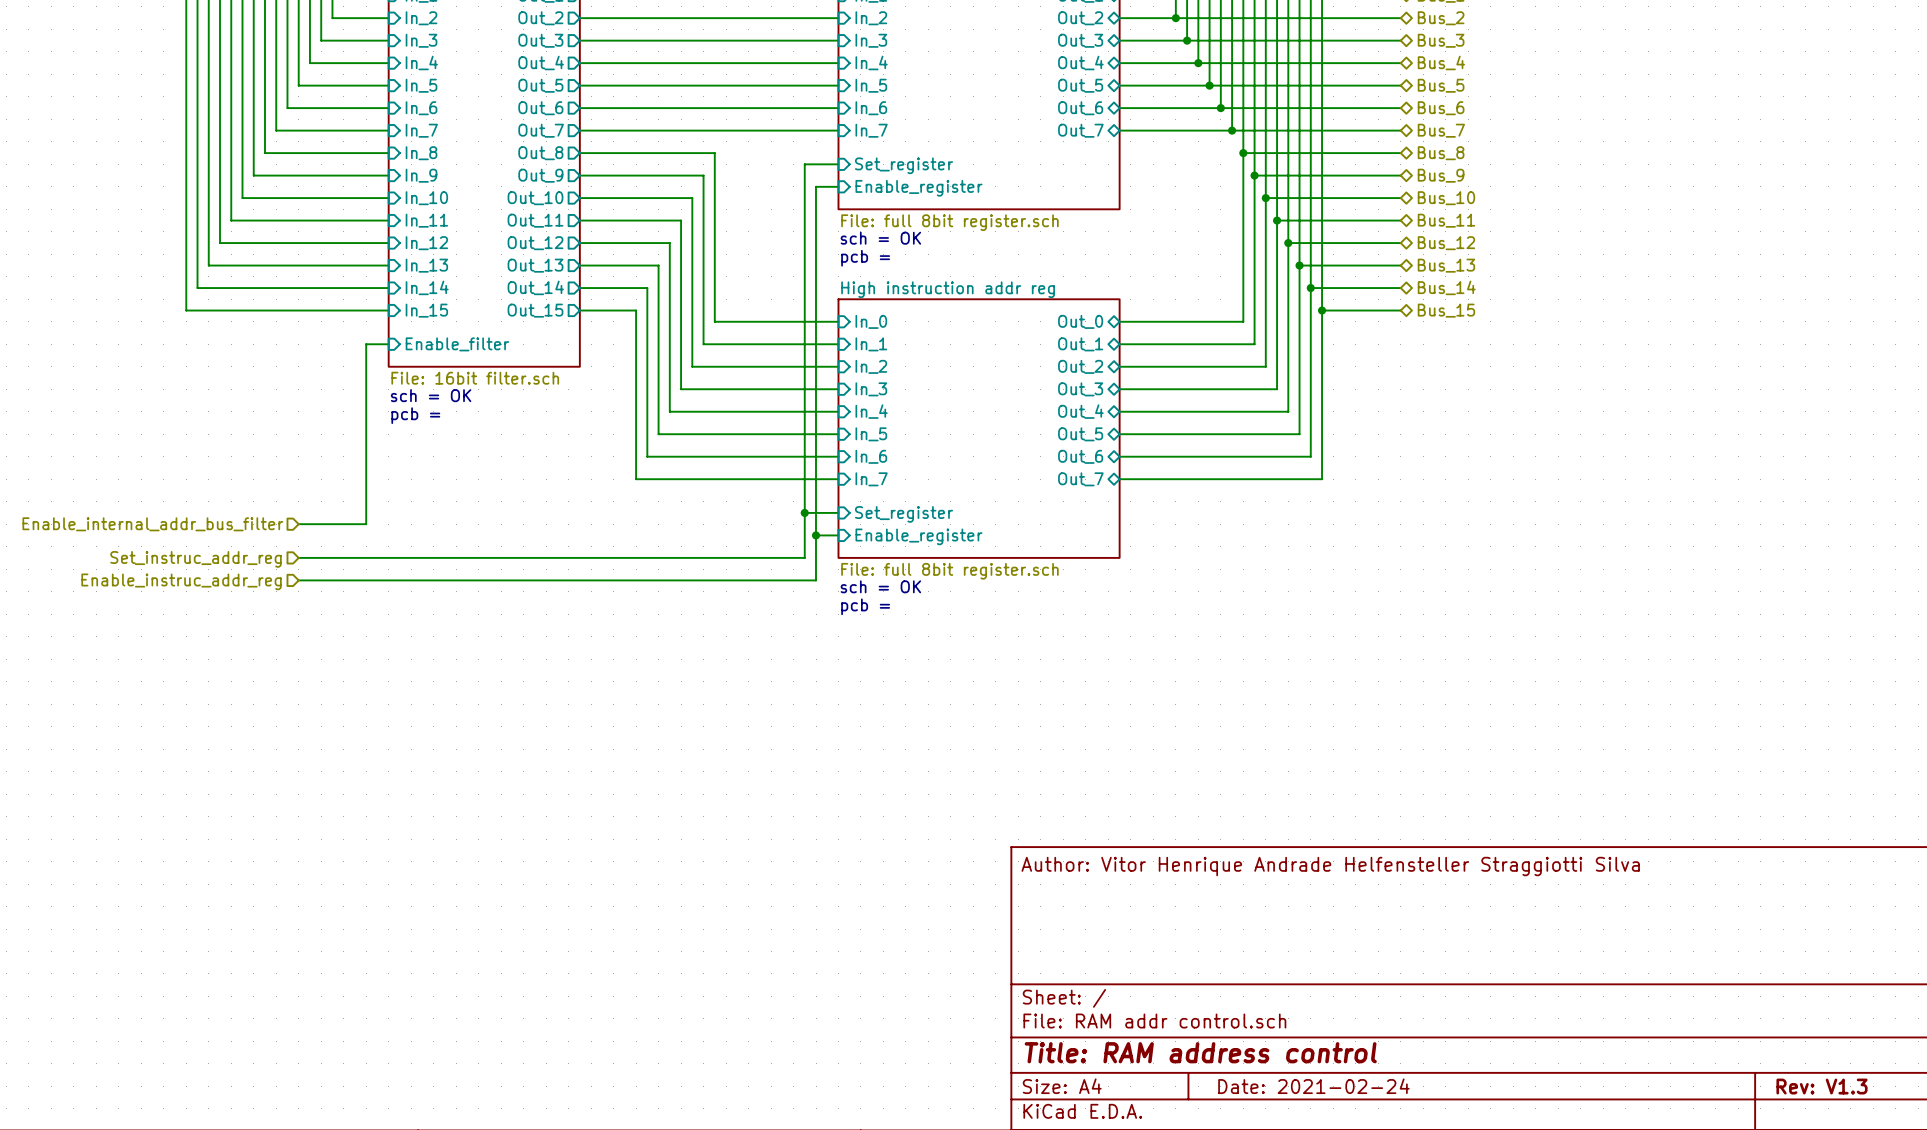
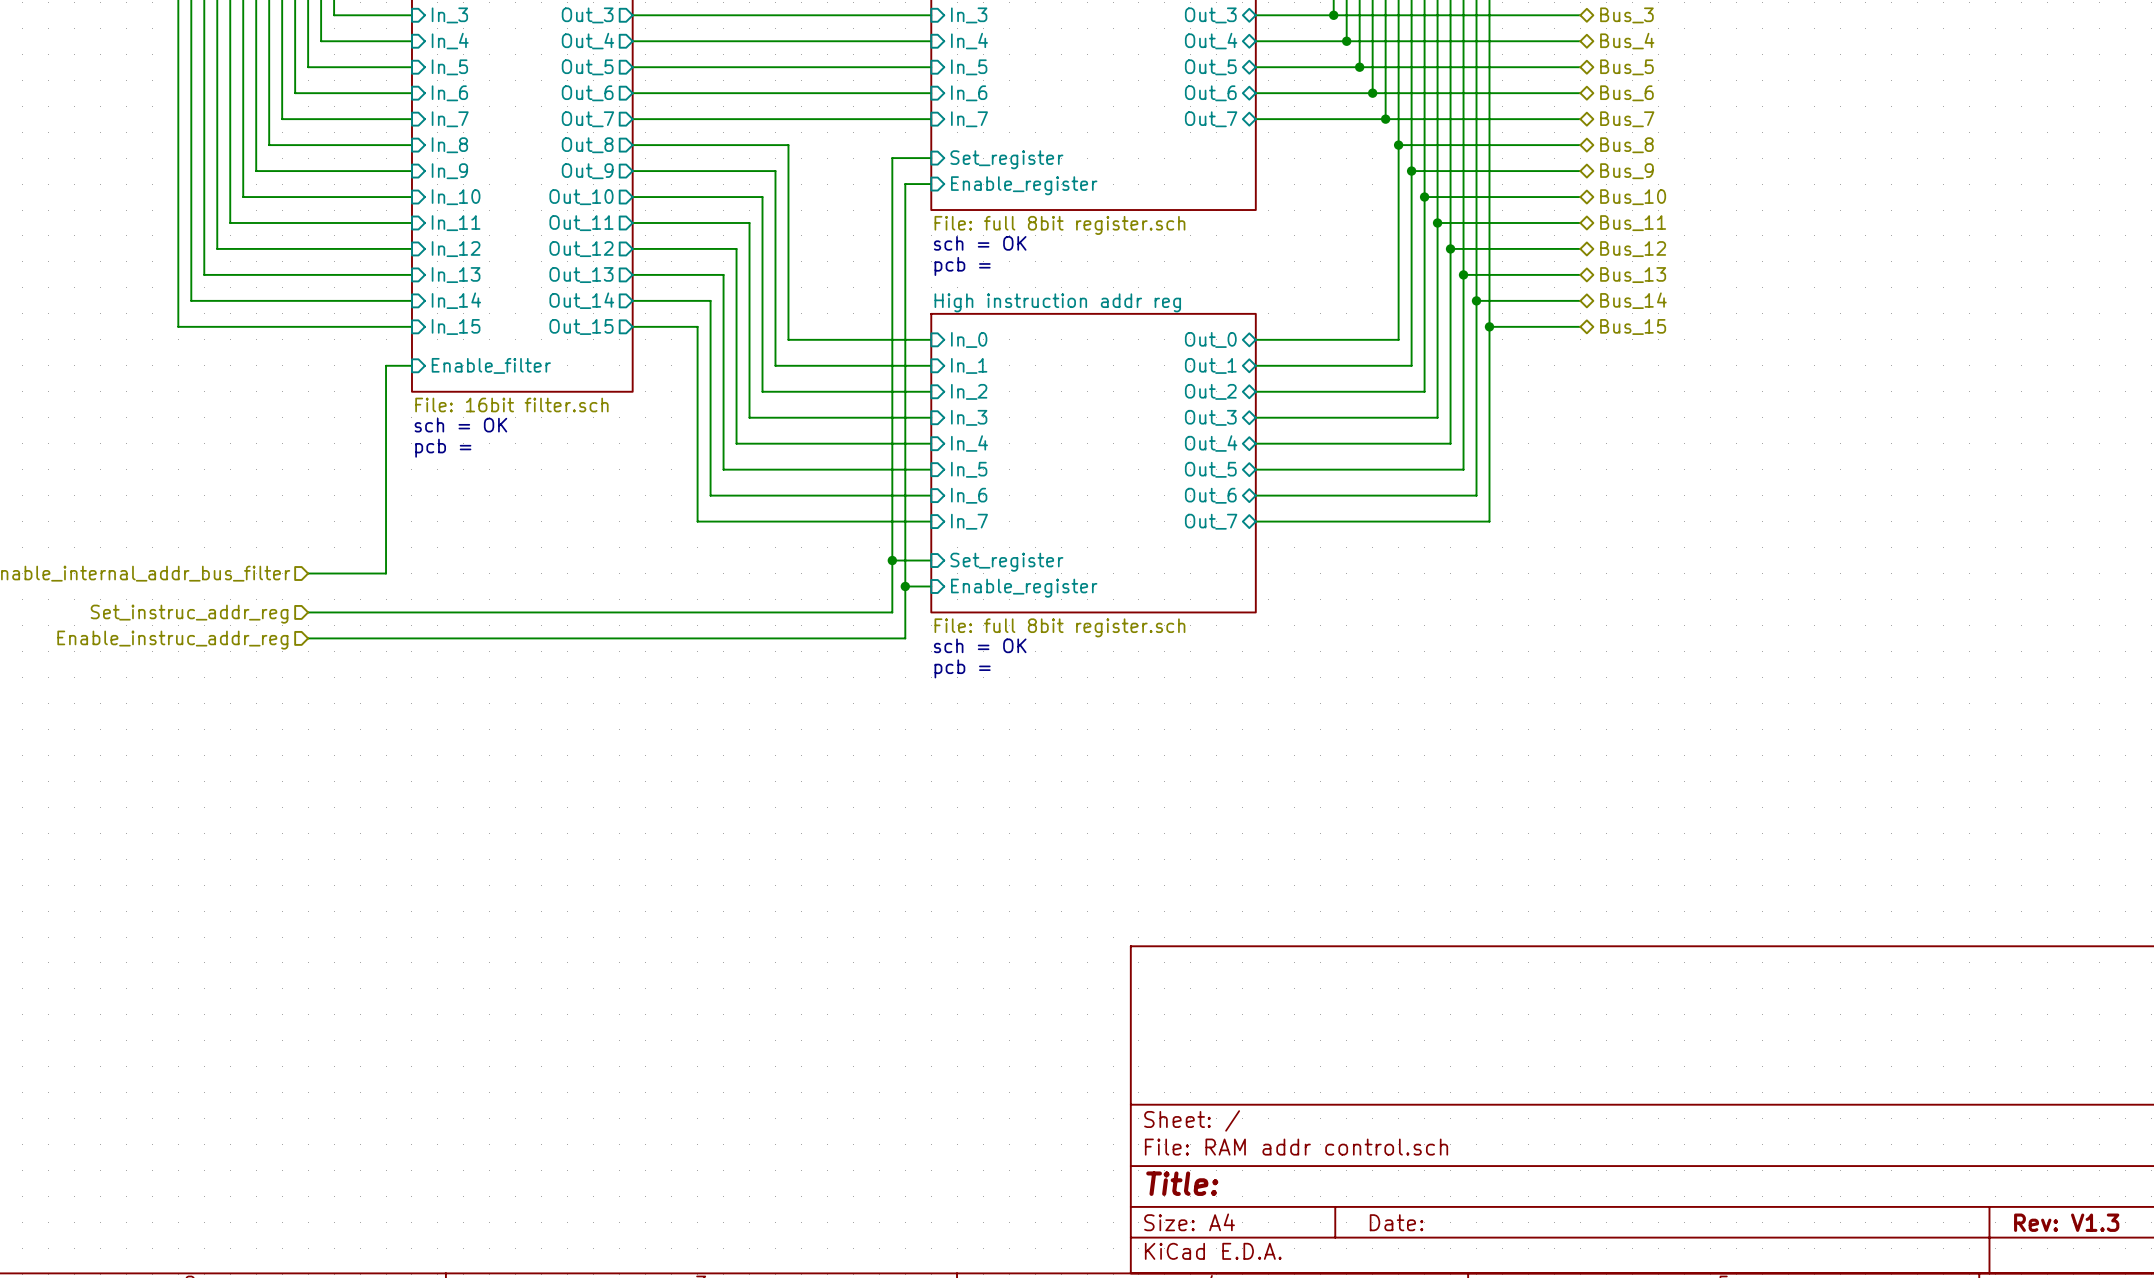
title block: Author: Vitor Henrique Andrade Helfensteller Straggiotti Silva (1330, 866) -> none
title block: Title: RAM address control (1200, 1052) -> Title: (1182, 1183)
title block: Date: 2021-02-24 (1313, 1086) -> Date: (1396, 1222)

